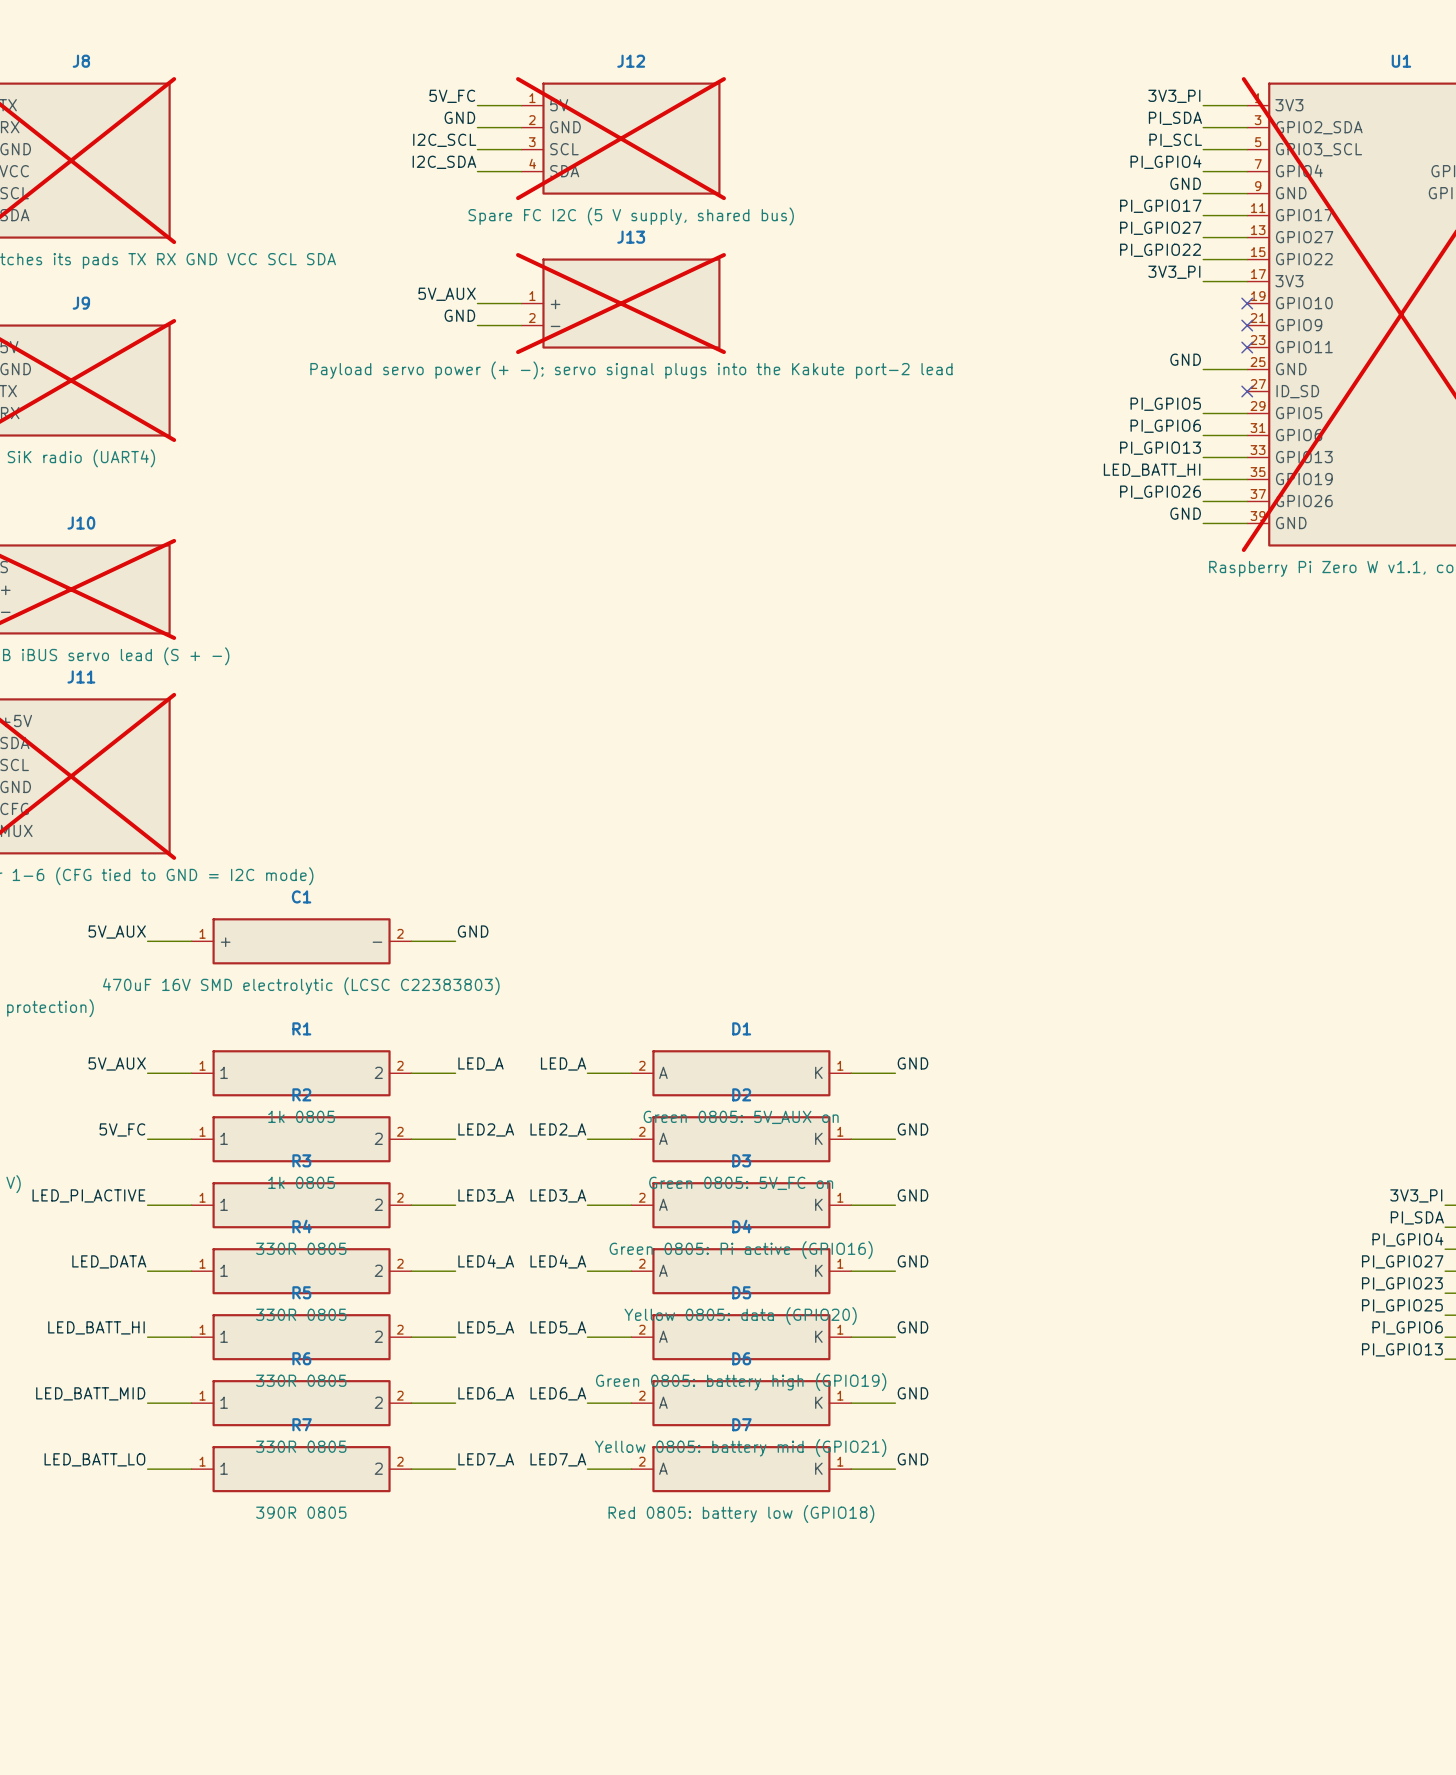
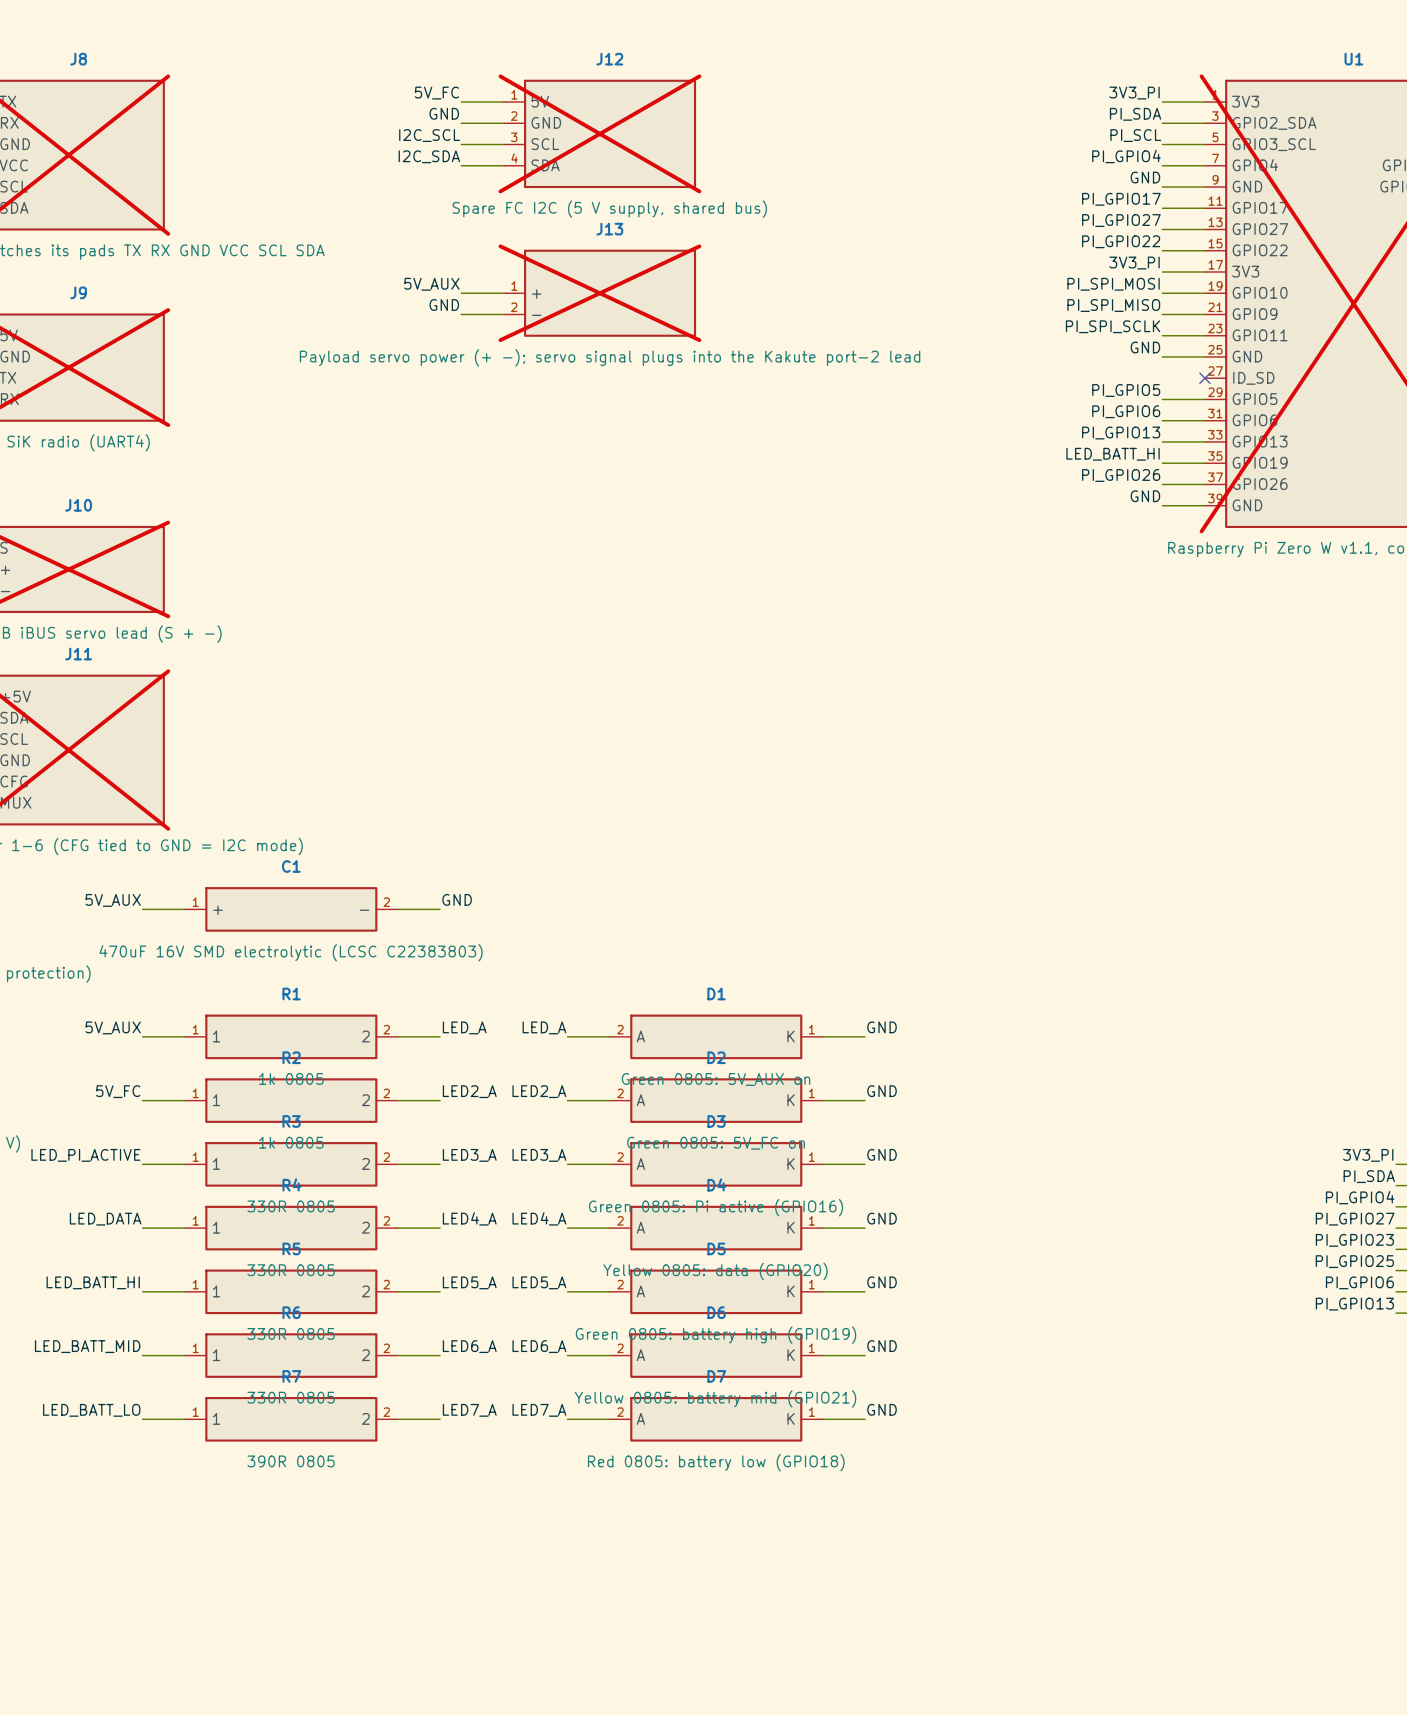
label: none -> PI_SPI_MOSI (1113, 284)
wire: none -> (1162, 293) (1204, 293)
no-connect mark: (1247, 303) -> none
label: none -> PI_SPI_MISO (1113, 305)
wire: none -> (1162, 314) (1204, 314)
no-connect mark: (1247, 325) -> none
label: none -> PI_SPI_SCLK (1113, 326)
wire: none -> (1162, 335) (1204, 335)
no-connect mark: (1247, 347) -> none

